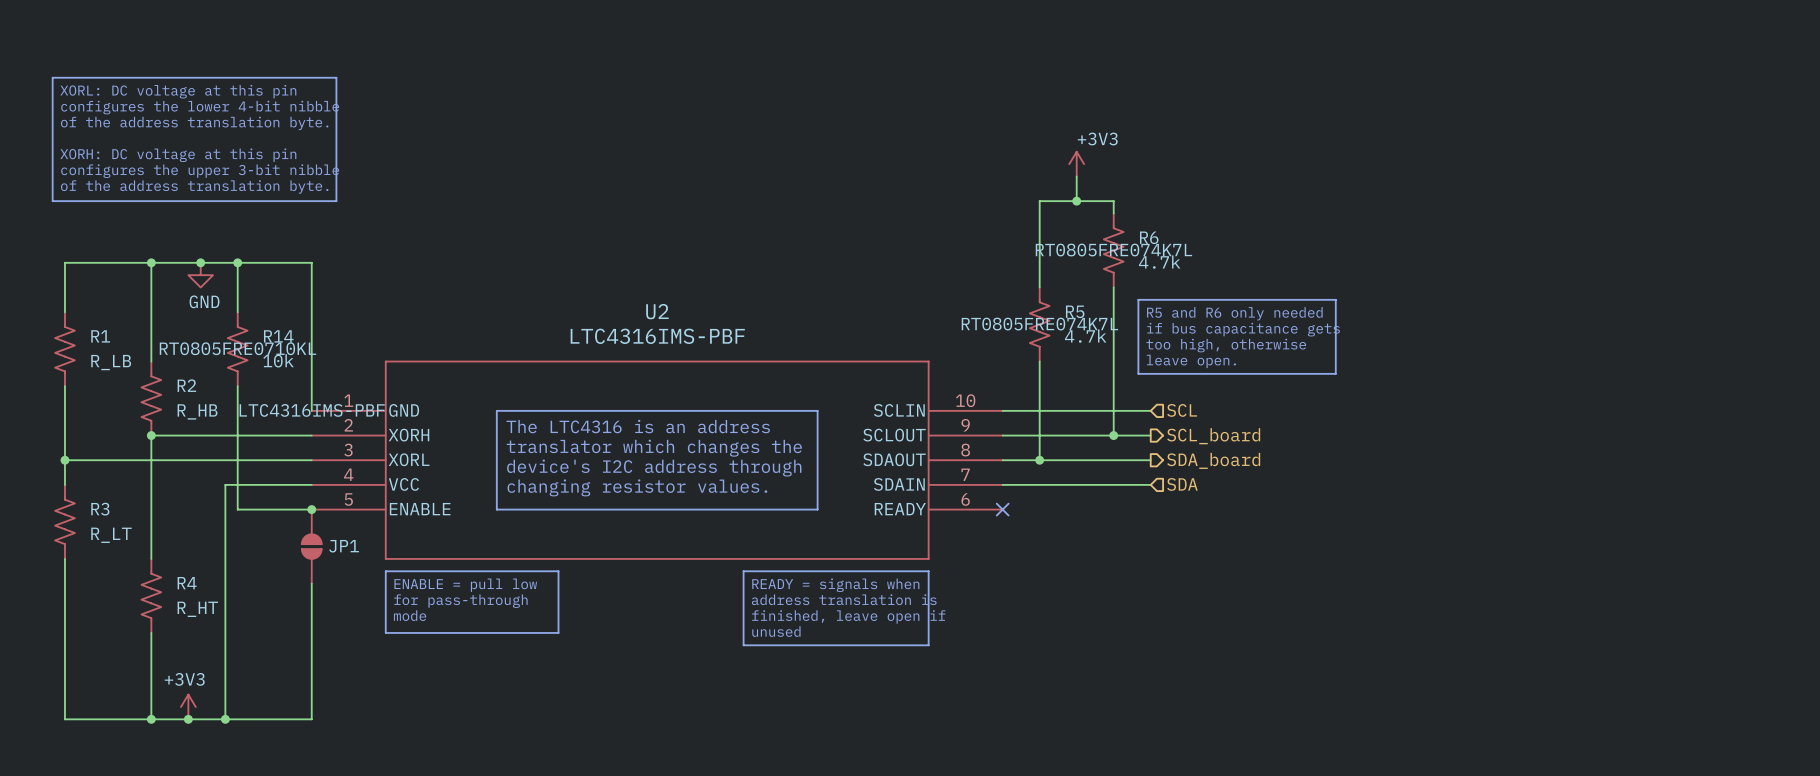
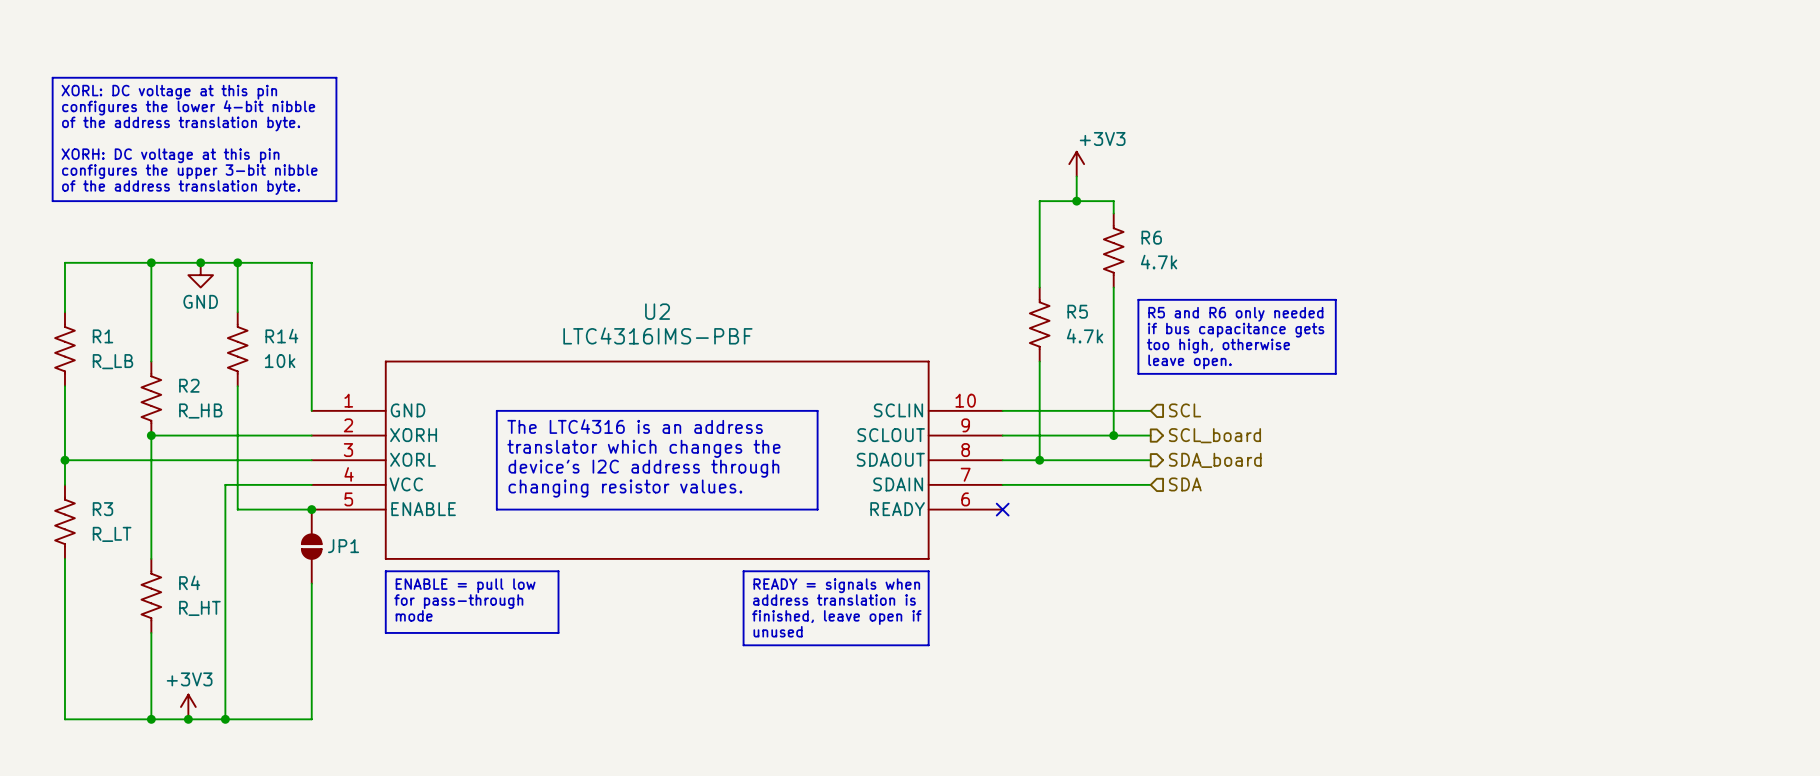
R6 text: RT0805FRE074K7L (1113, 250) -> none
R5 text: RT0805FRE074K7L (1039, 324) -> none
R14 text: RT0805FRE0710KL (237, 348) -> none
U2 text: LTC4316IMS-PBF (312, 410) -> none

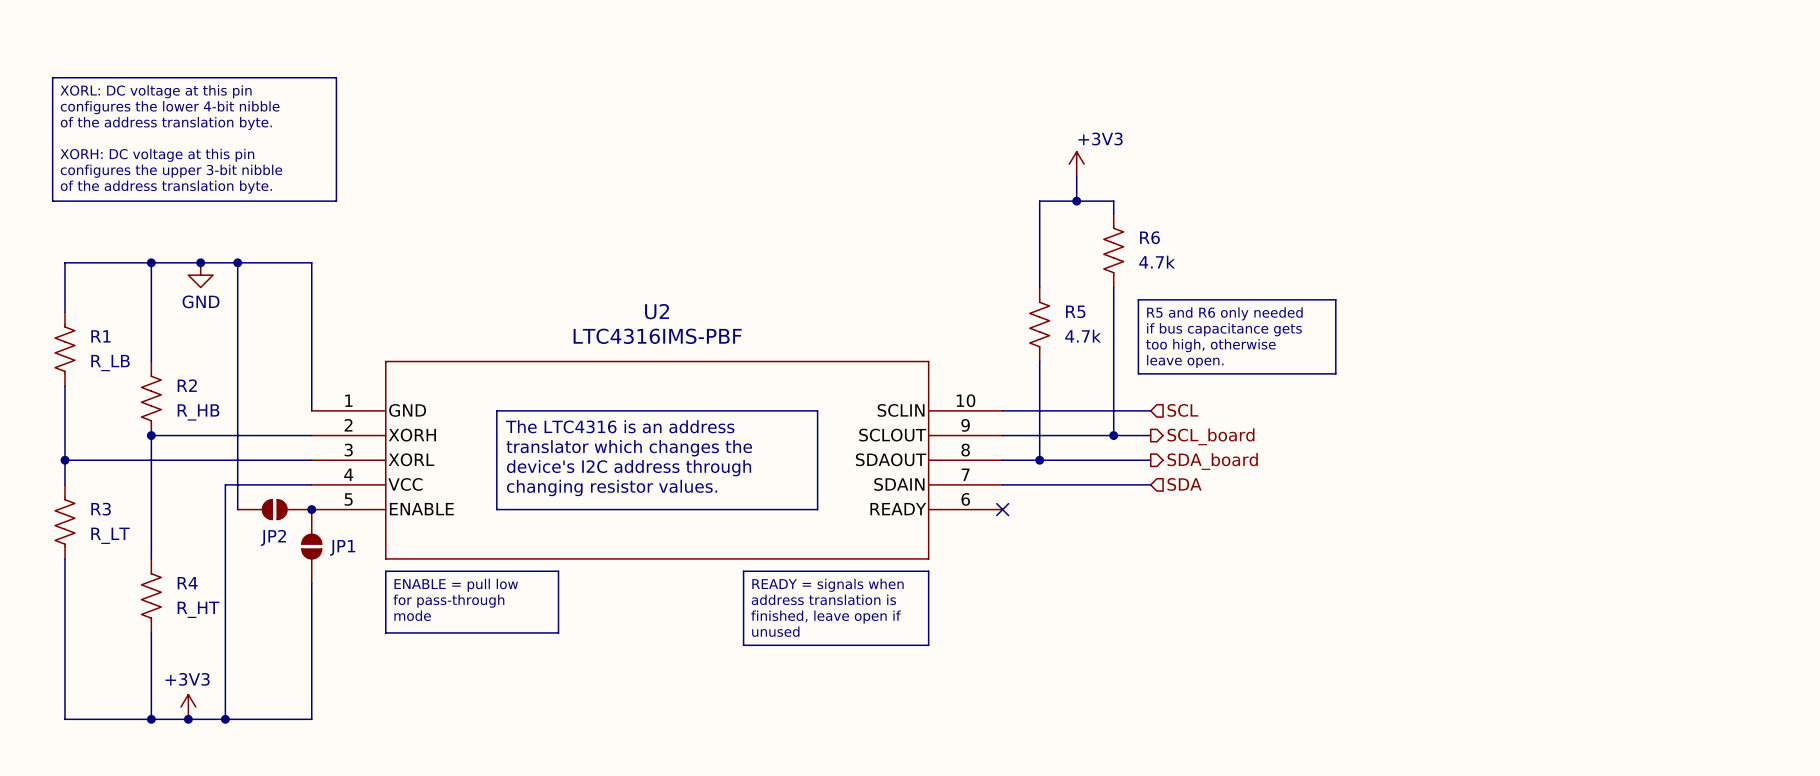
R14: 10k (237, 349) -> none
JP2: none -> (274, 509)

